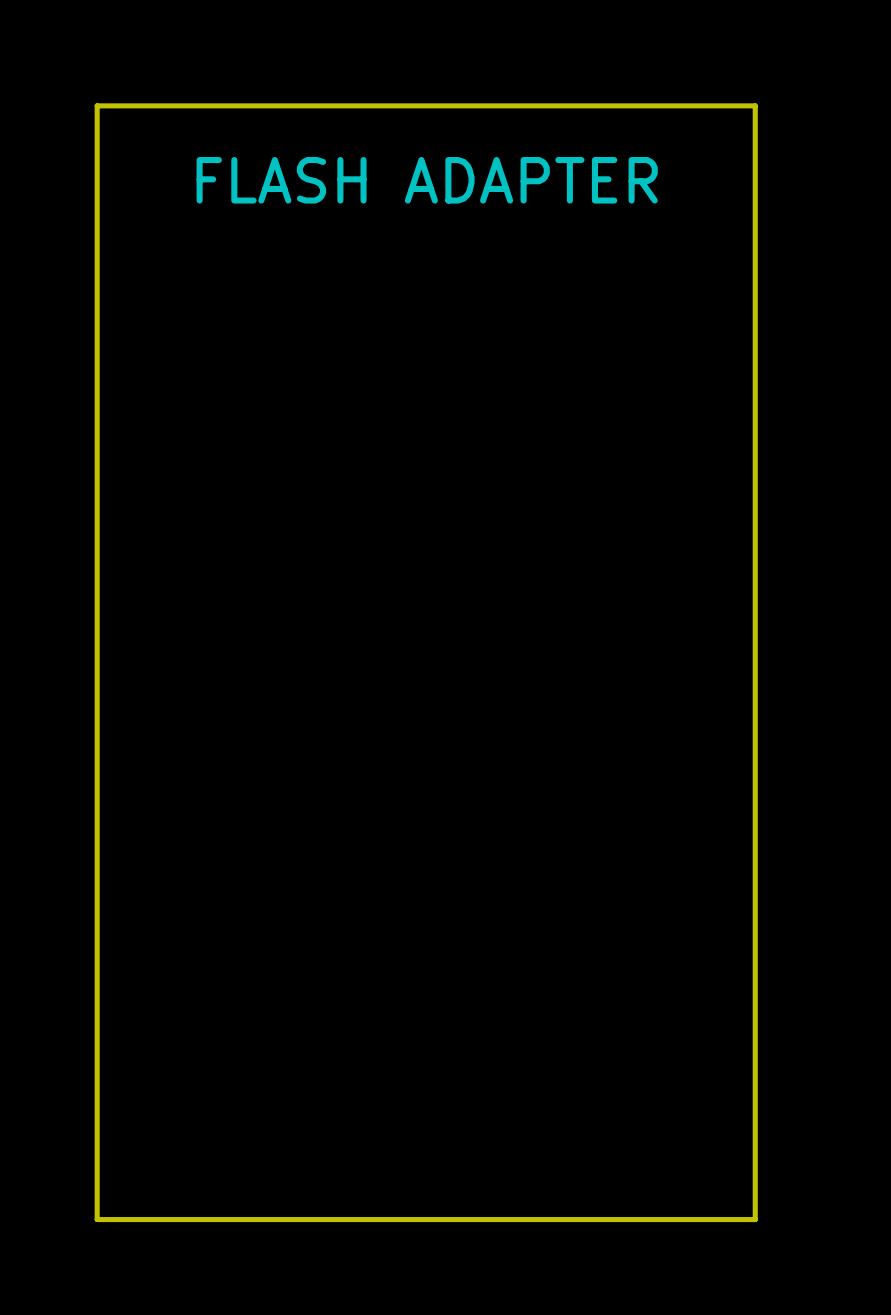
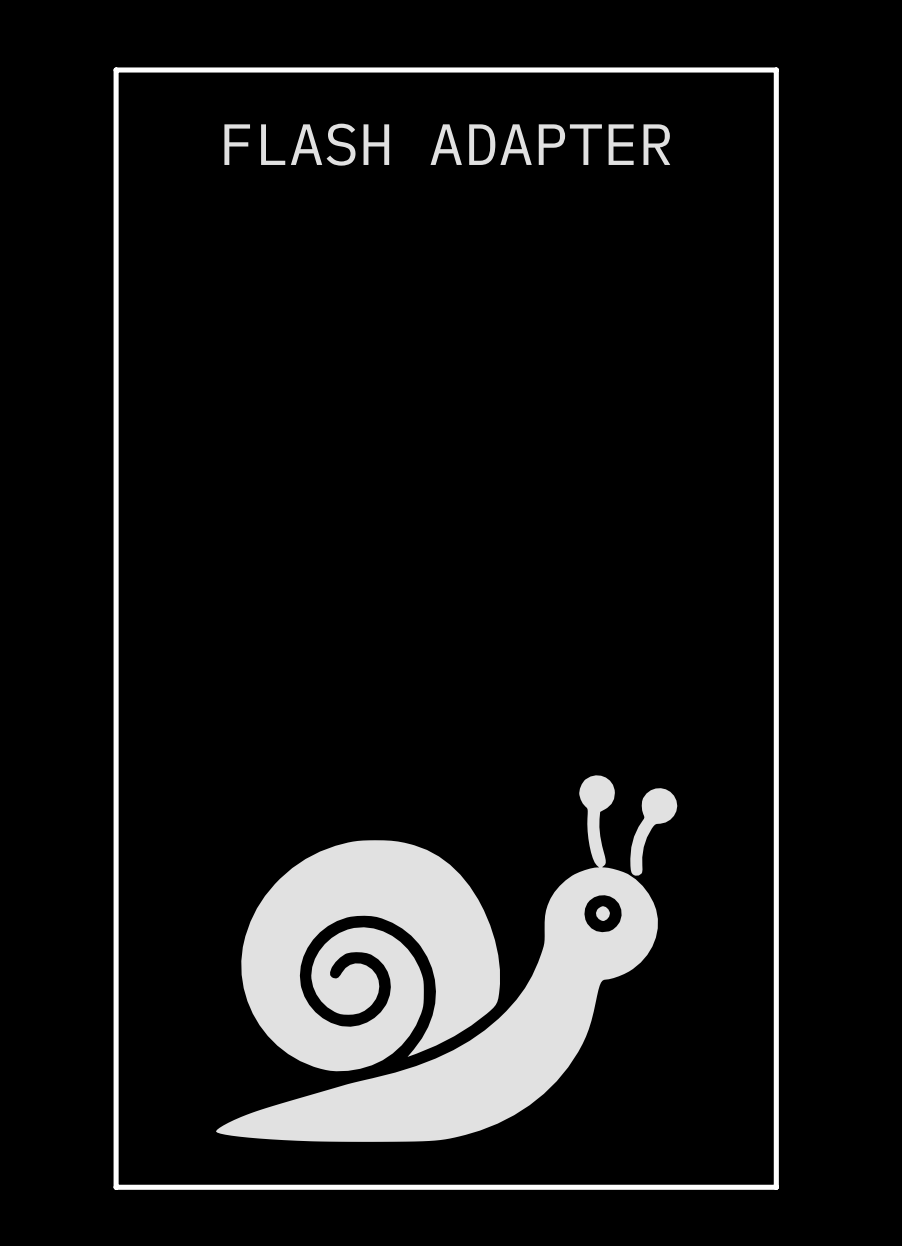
drawing: none -> [216, 775, 678, 1142]

